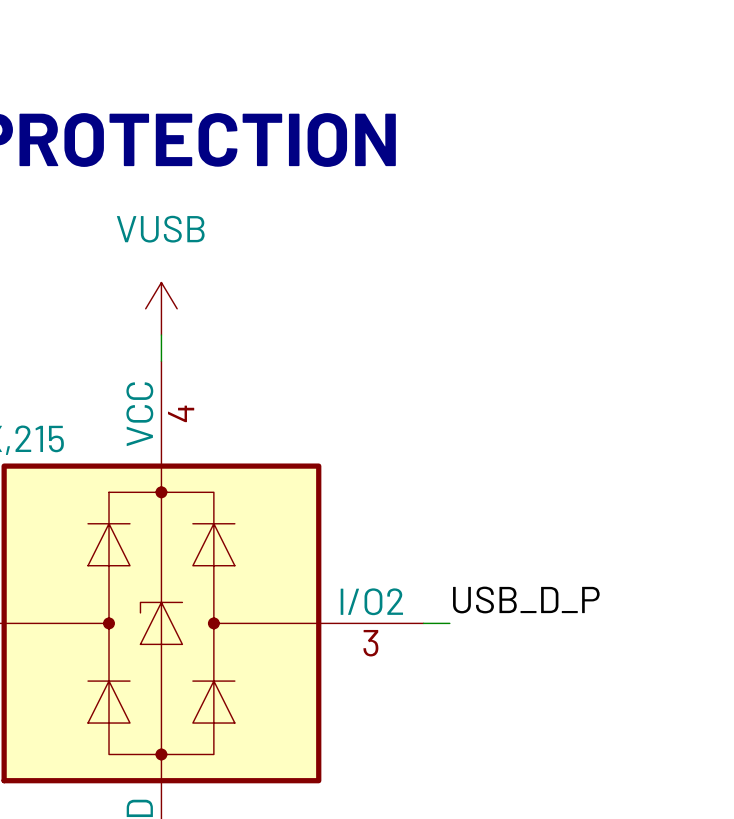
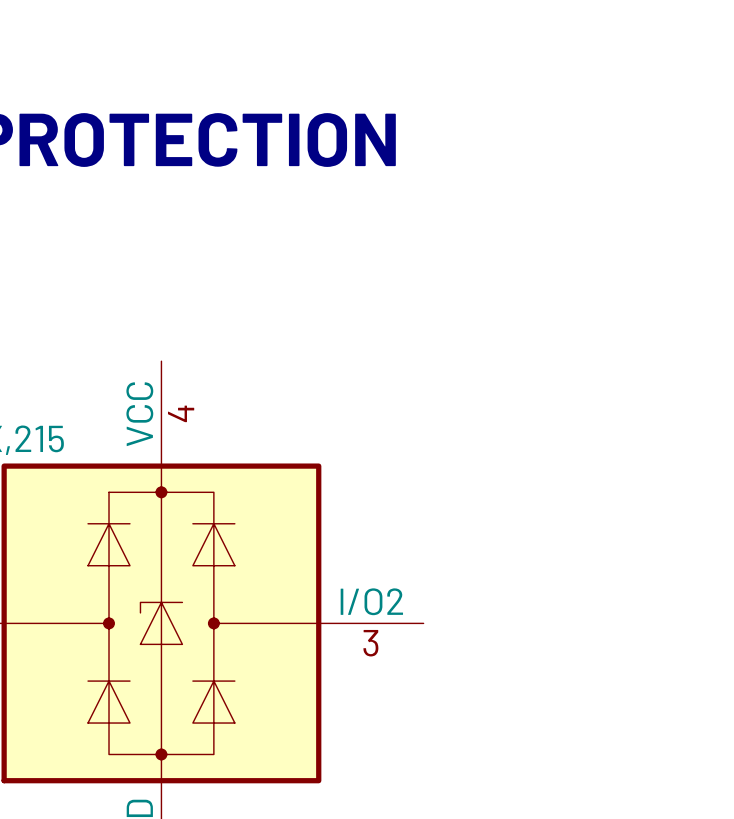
power symbol: VUSB (161, 308) -> none
wire: (161, 335) (161, 361) -> none
label: USB_D_P (526, 600) -> none
wire: (423, 623) (449, 623) -> none

